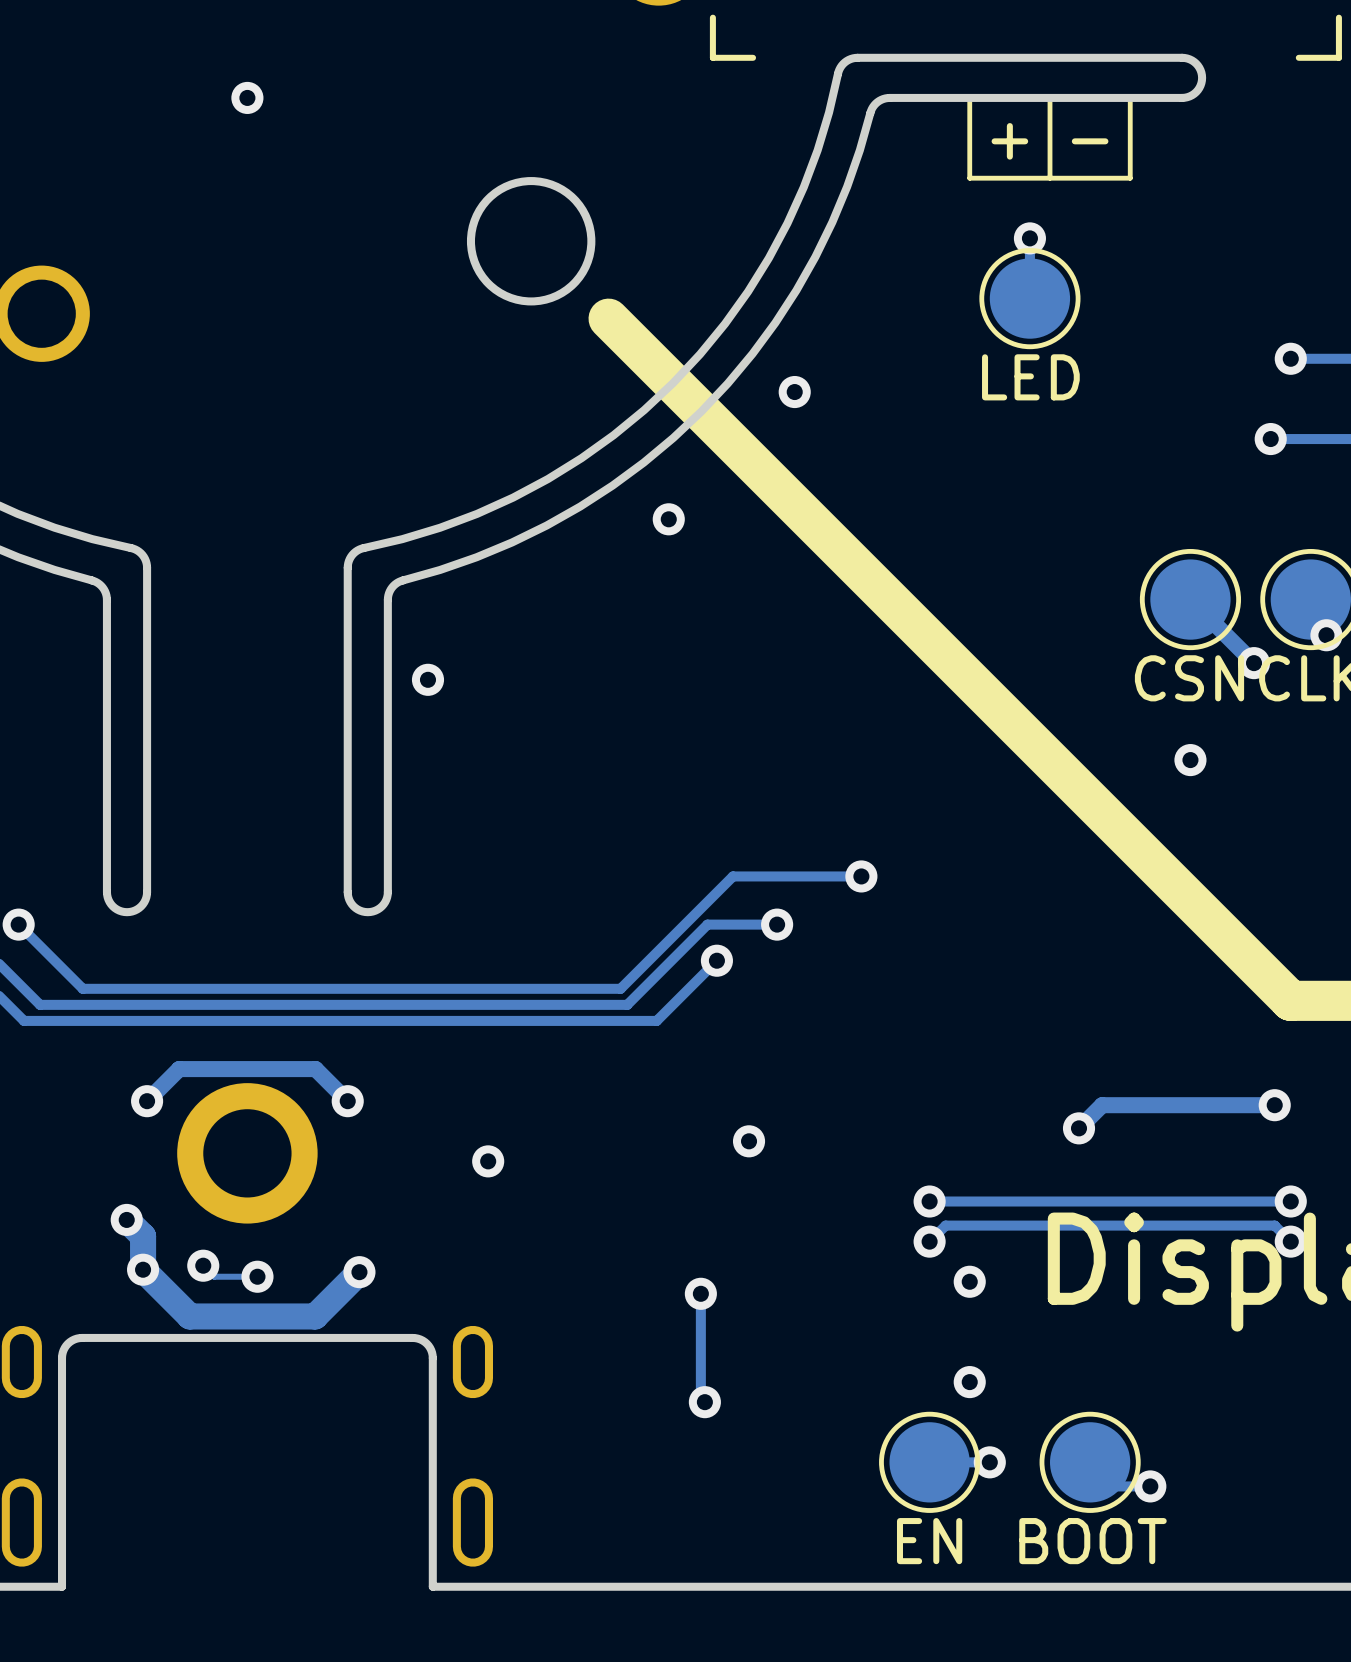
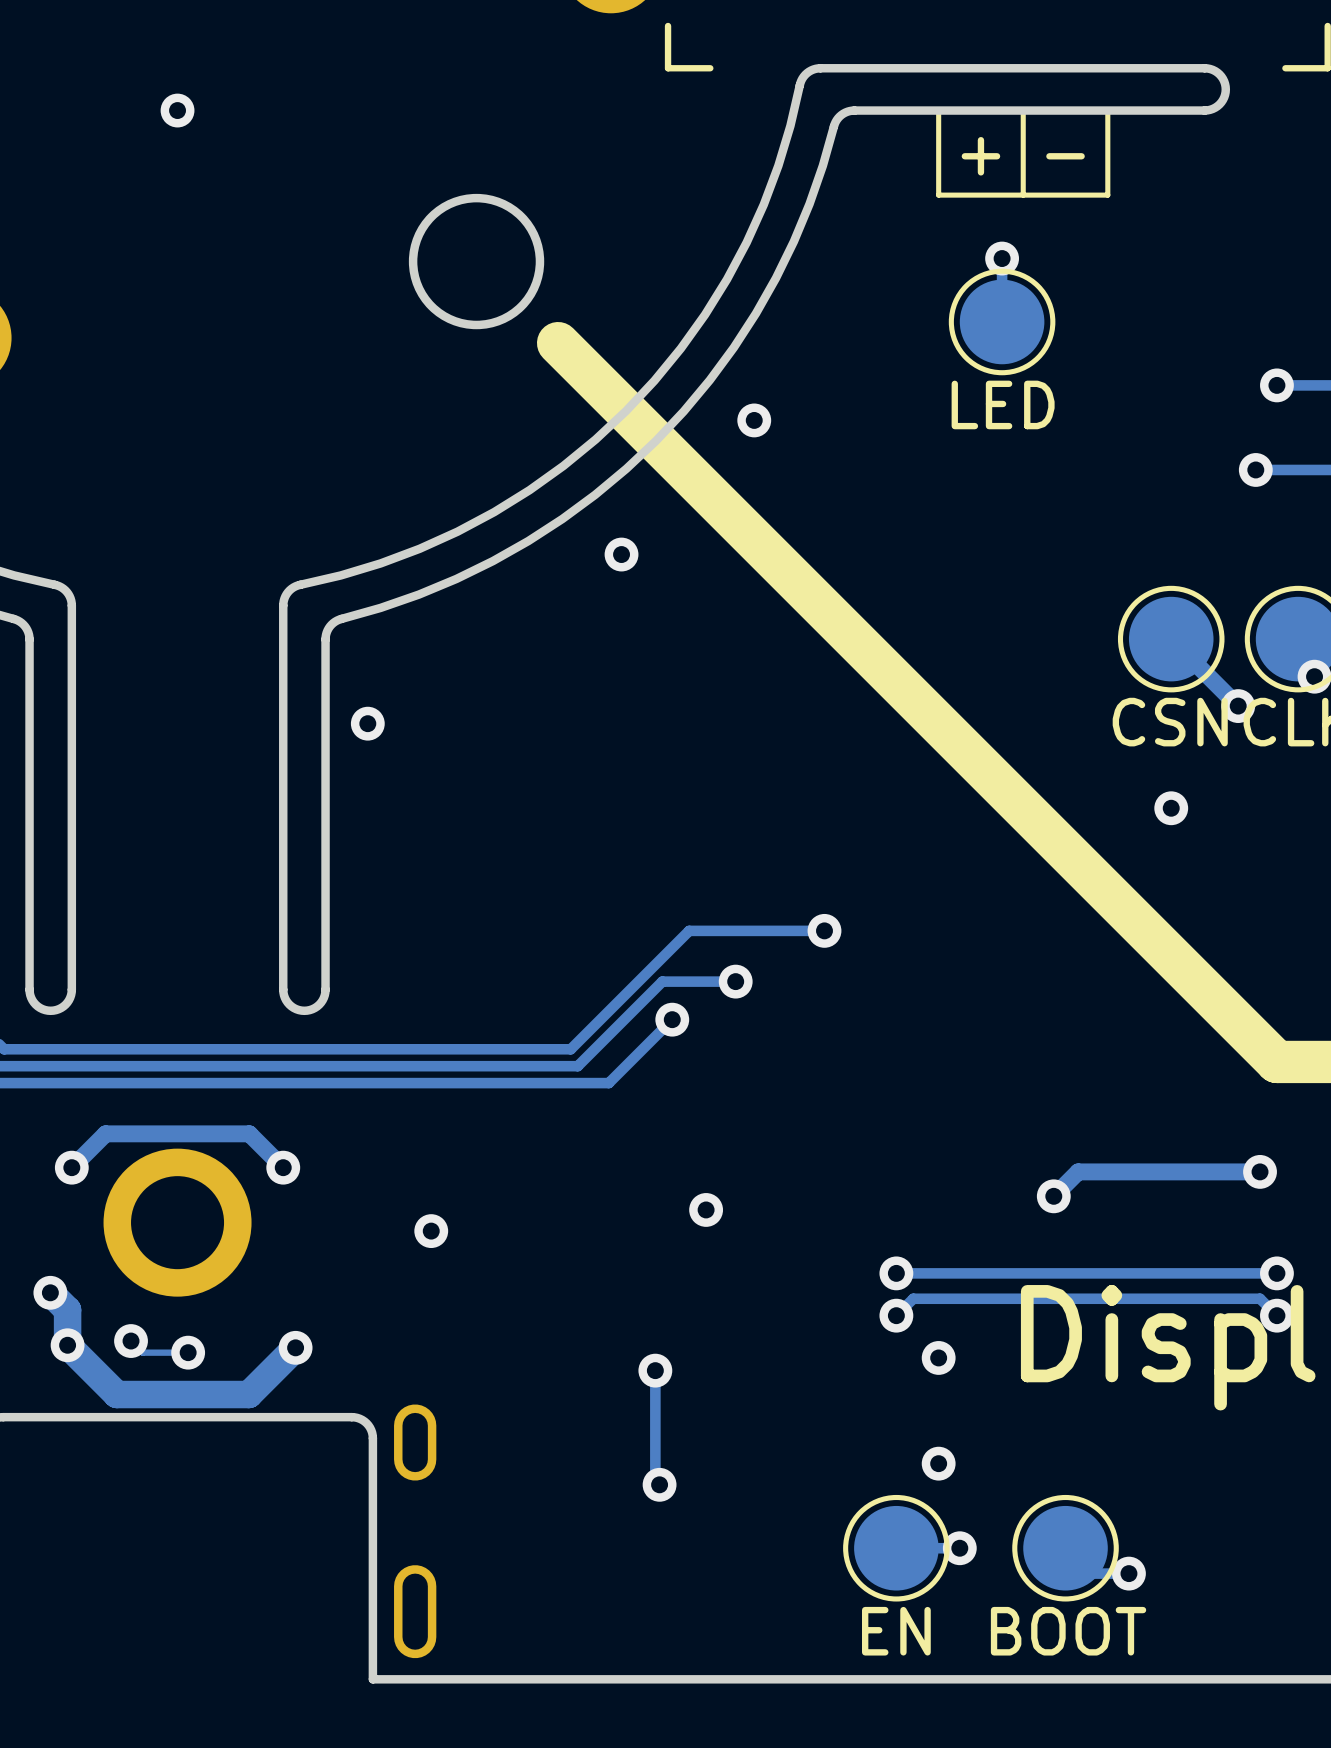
board edge: (1182, 57) (1189, 59) (1196, 63) (1200, 70) (1202, 77) (1200, 85) (1196, 92) (1189, 96) (1182, 97) -> (1162, 68) (1210, 68) (1221, 76) (1225, 89) (1221, 102) (1210, 109) (1162, 110)
board edge: (147, 892) (145, 899) (141, 906) (134, 910) (127, 912) (119, 910) (112, 906) (108, 899) (106, 892) -> (71, 947) (71, 995) (63, 1006) (50, 1010) (37, 1006) (30, 995) (29, 947)
board edge: (387, 892) (386, 899) (381, 906) (375, 910) (367, 912) (360, 910) (353, 906) (349, 899) (347, 892) -> (325, 947) (324, 995) (317, 1006) (304, 1010) (291, 1006) (283, 995) (283, 947)

